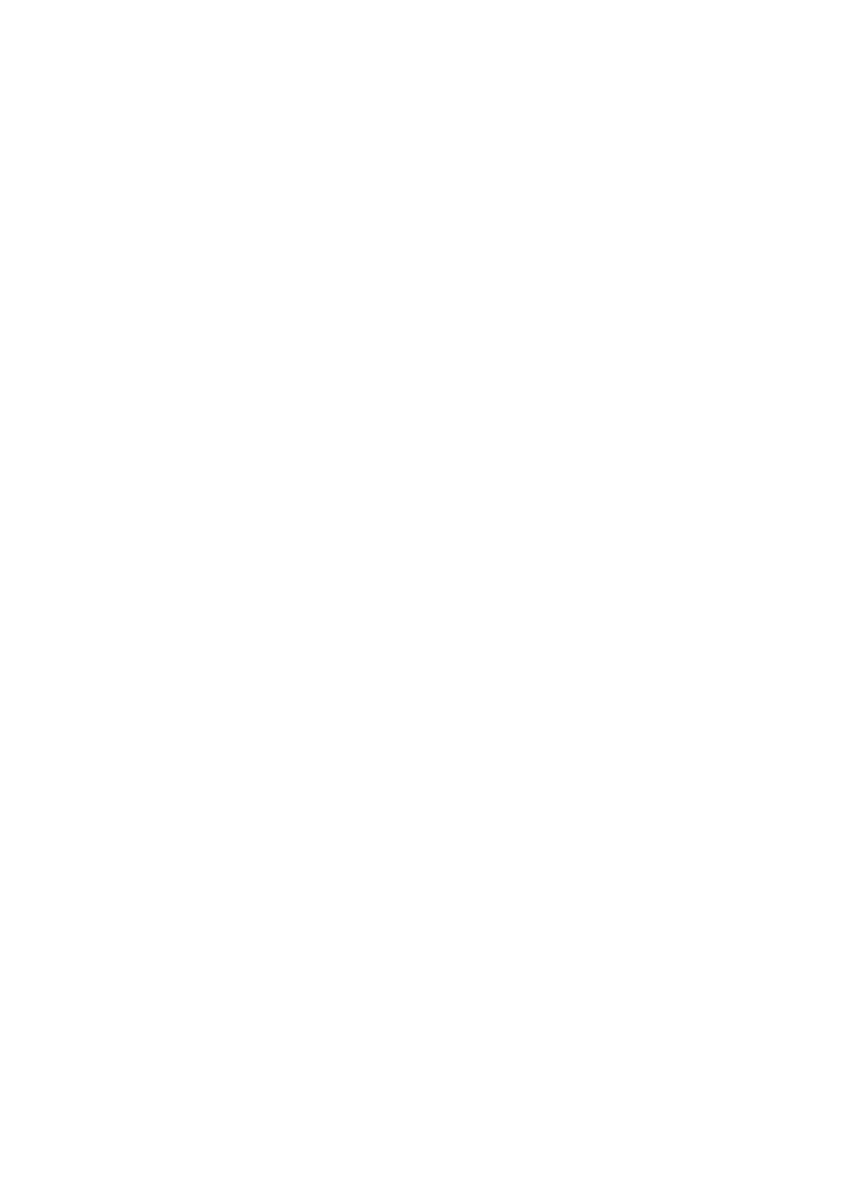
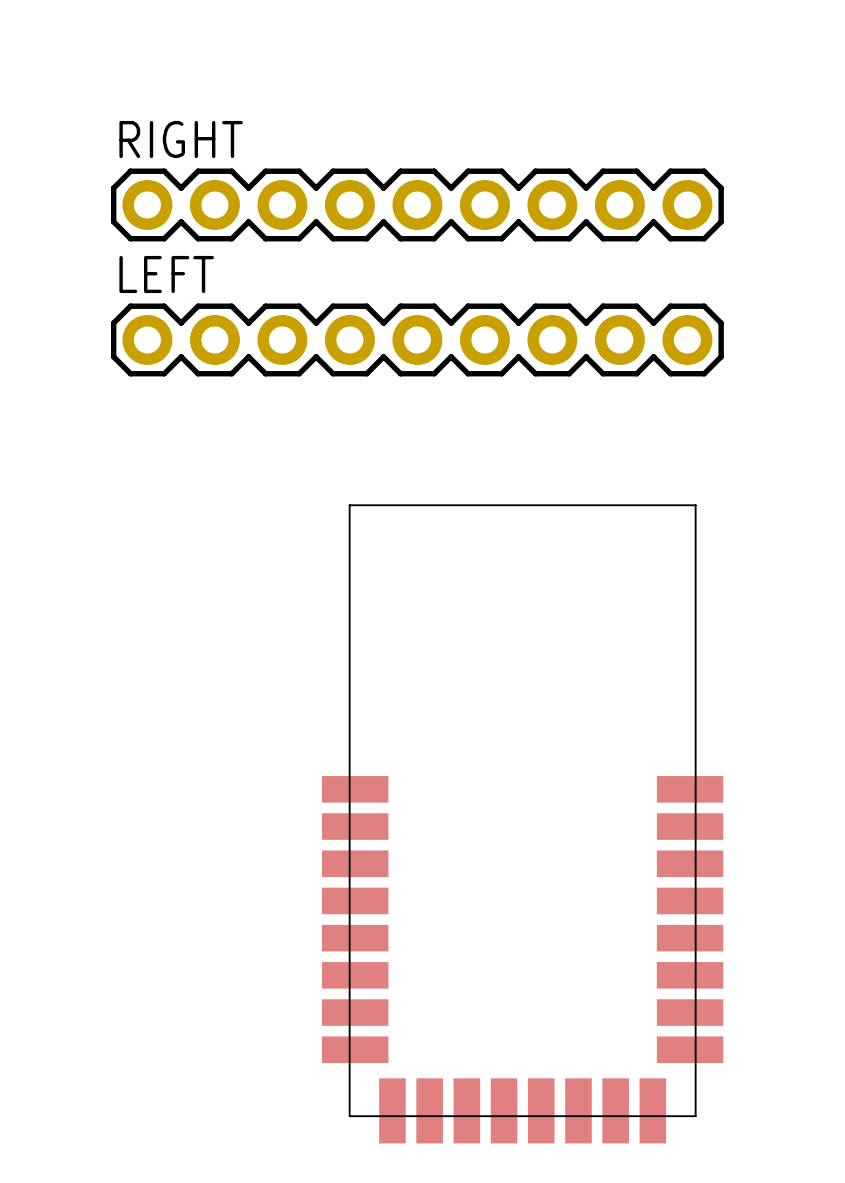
RIGHT: none -> (417, 204)
LEFT: none -> (417, 339)
part: none -> (522, 824)

